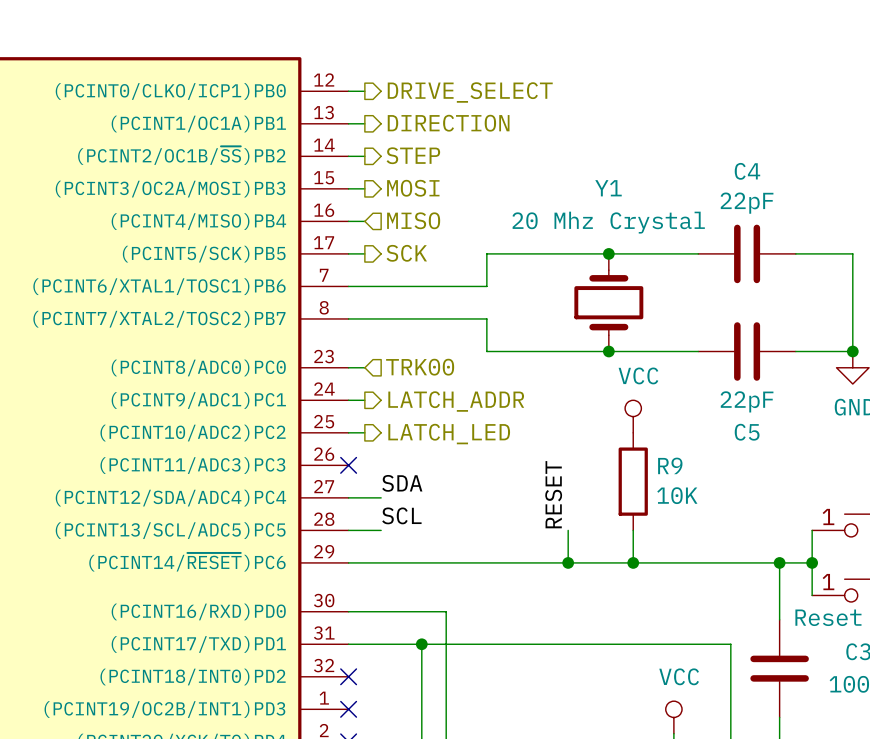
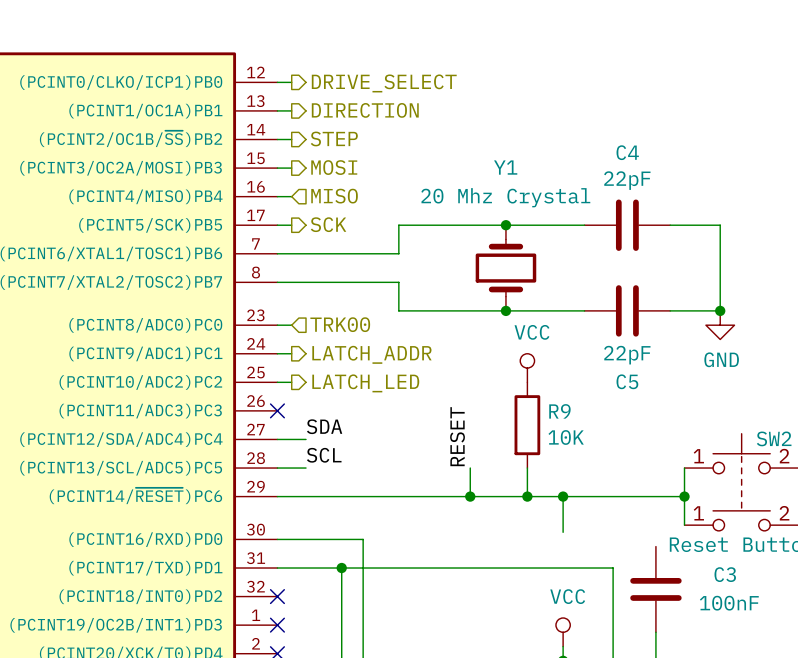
wire: none -> (563, 496) (563, 532)
junction: none -> (563, 496)
wire: (779, 562) (779, 619) -> none
junction: (779, 562) -> none

